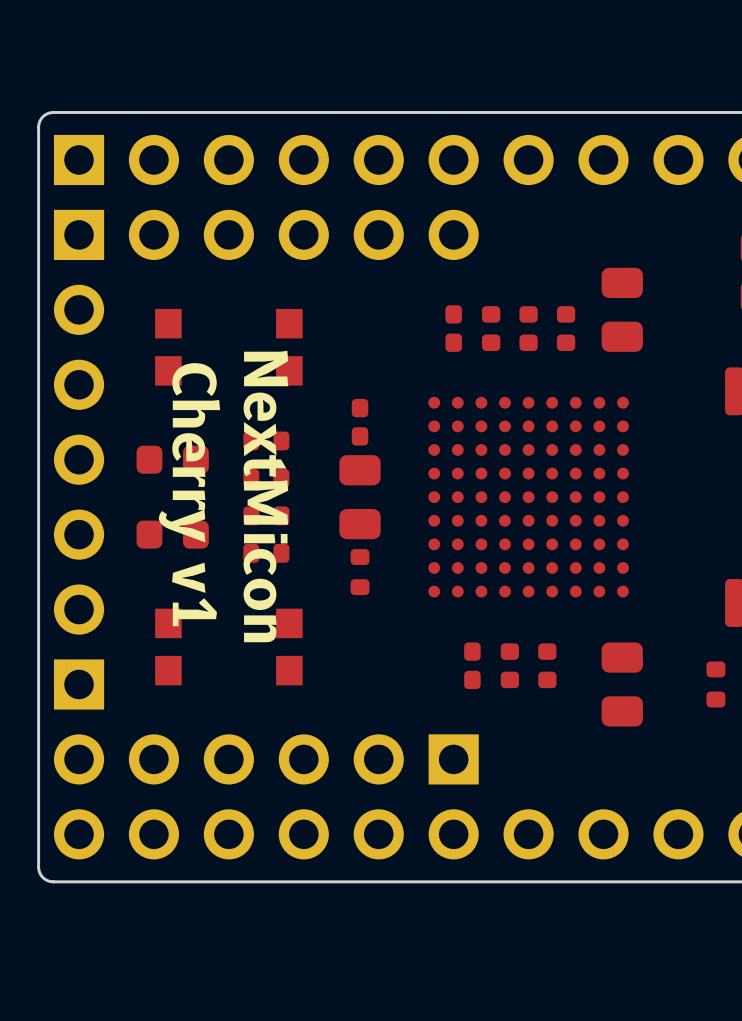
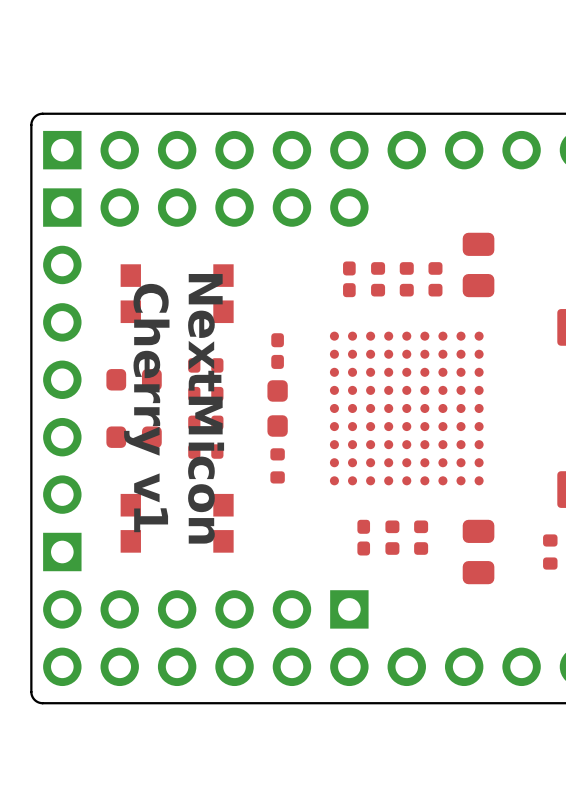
part footprint: [339, 455, 381, 540] -> [267, 380, 288, 437]

